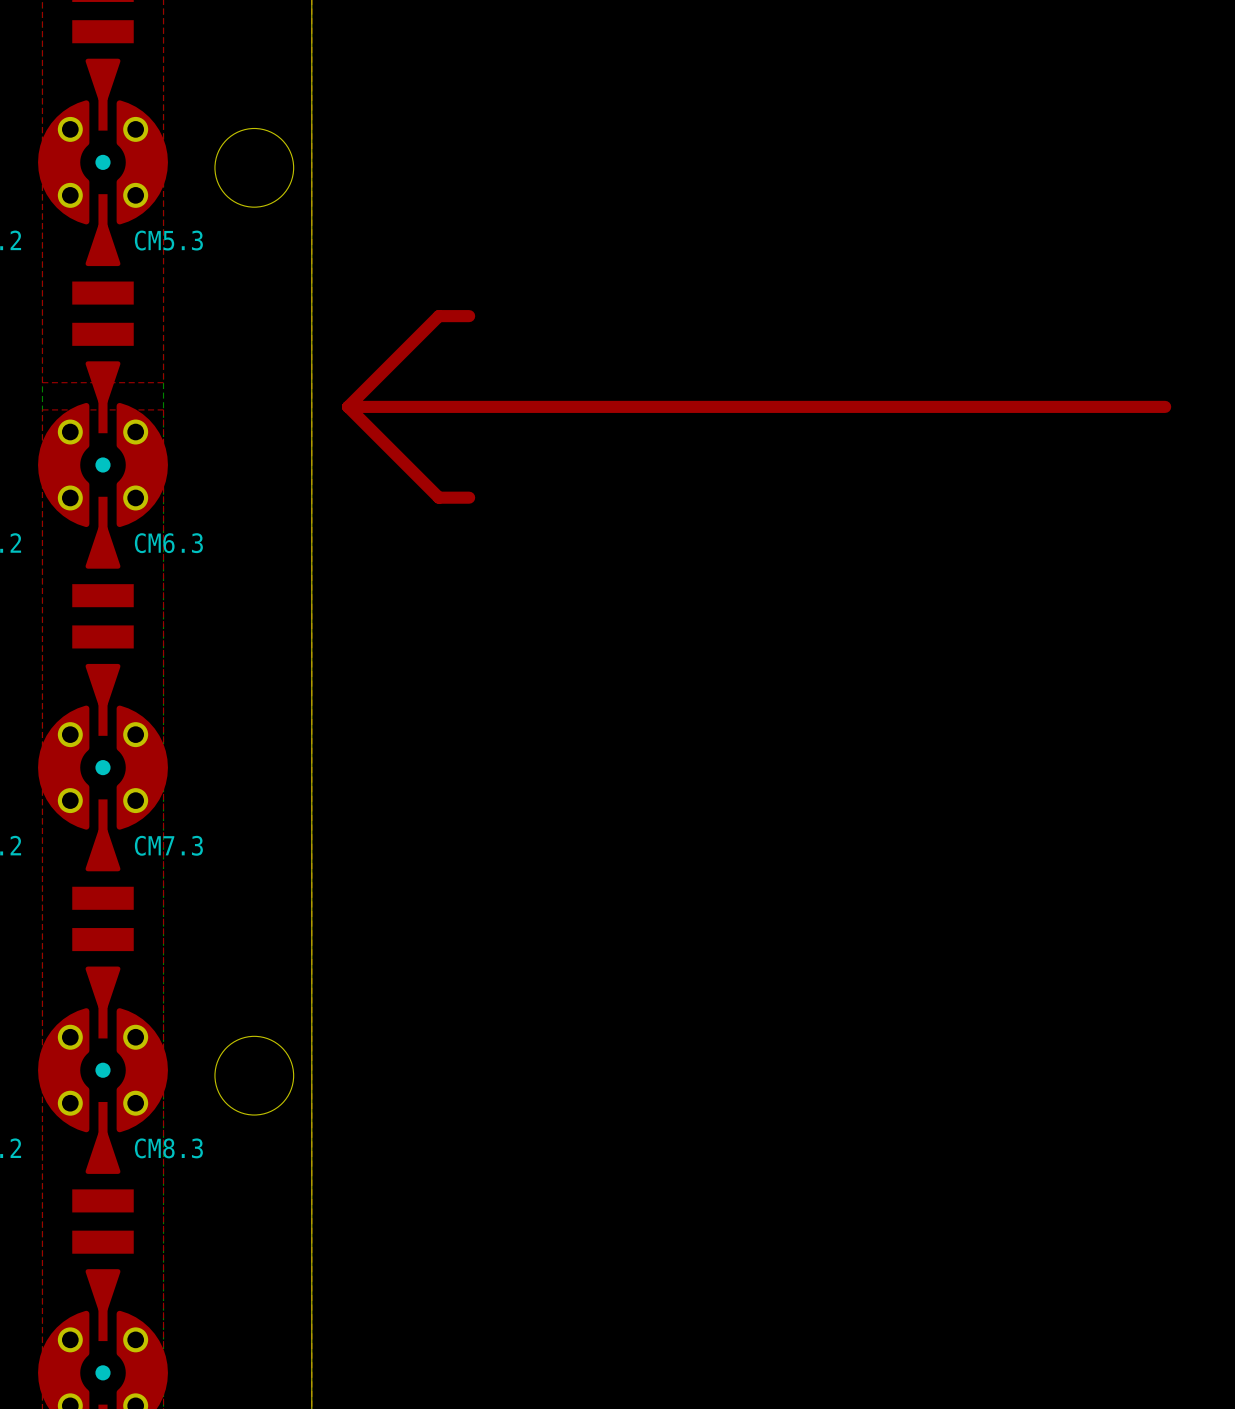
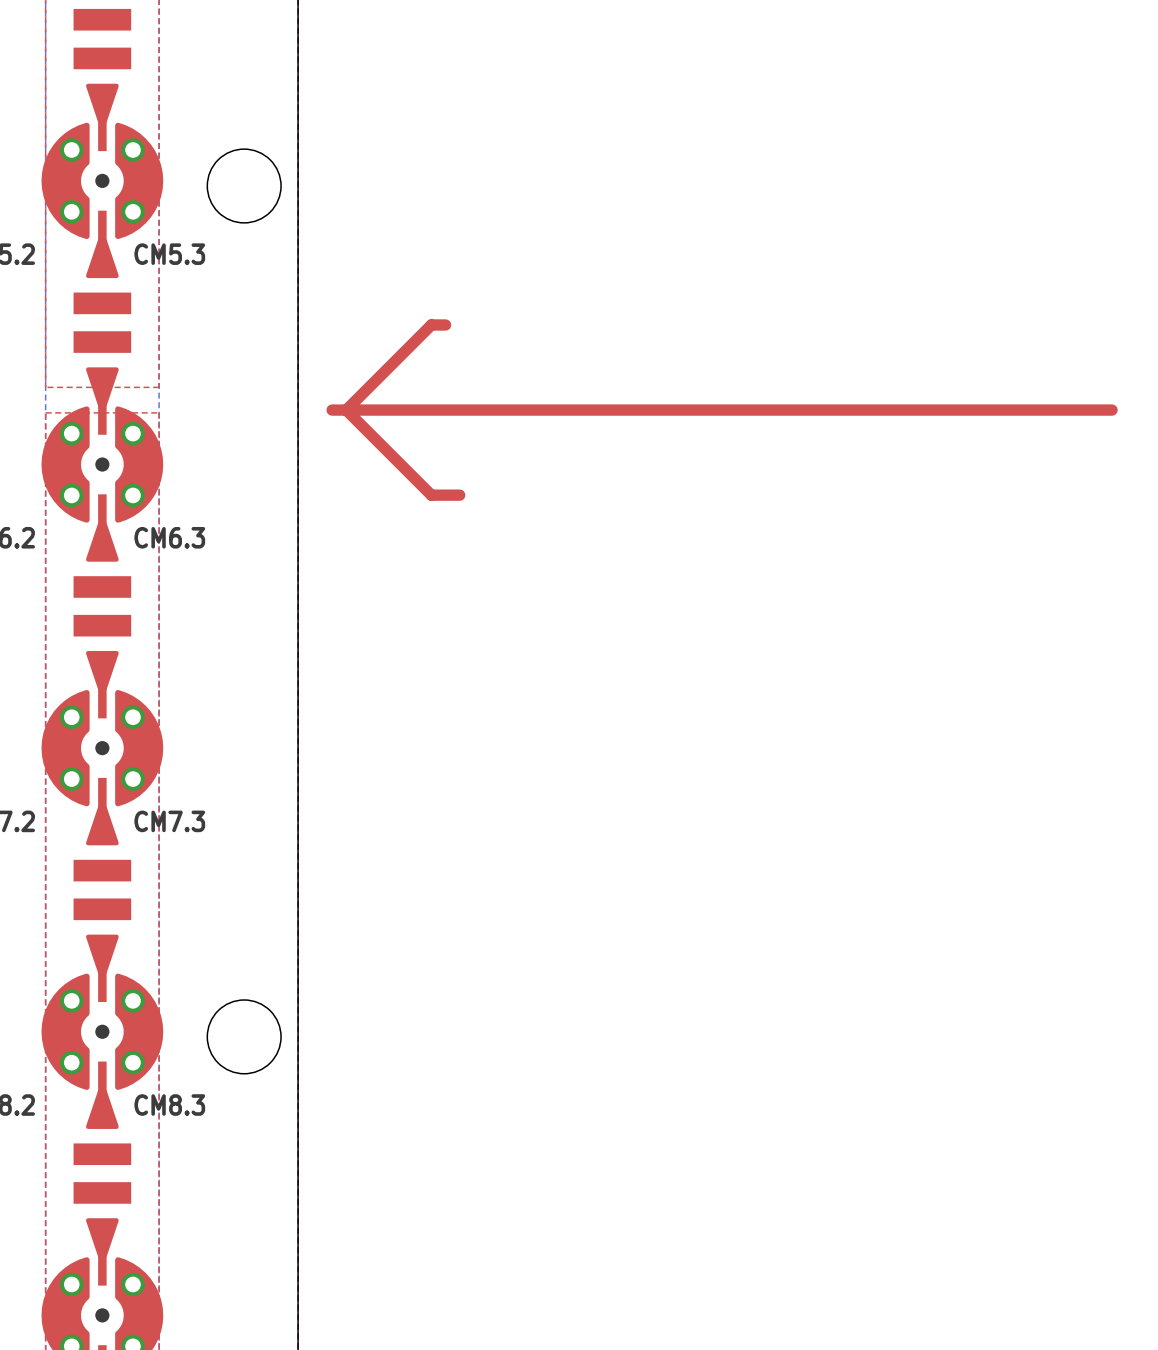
top track: (454, 316) (438, 316) (348, 406) (438, 497) (454, 497) -> (431, 324) (346, 410) (431, 495)
top track: none -> (1097, 410) (1112, 410)
top track: none -> (445, 495) (459, 495)

